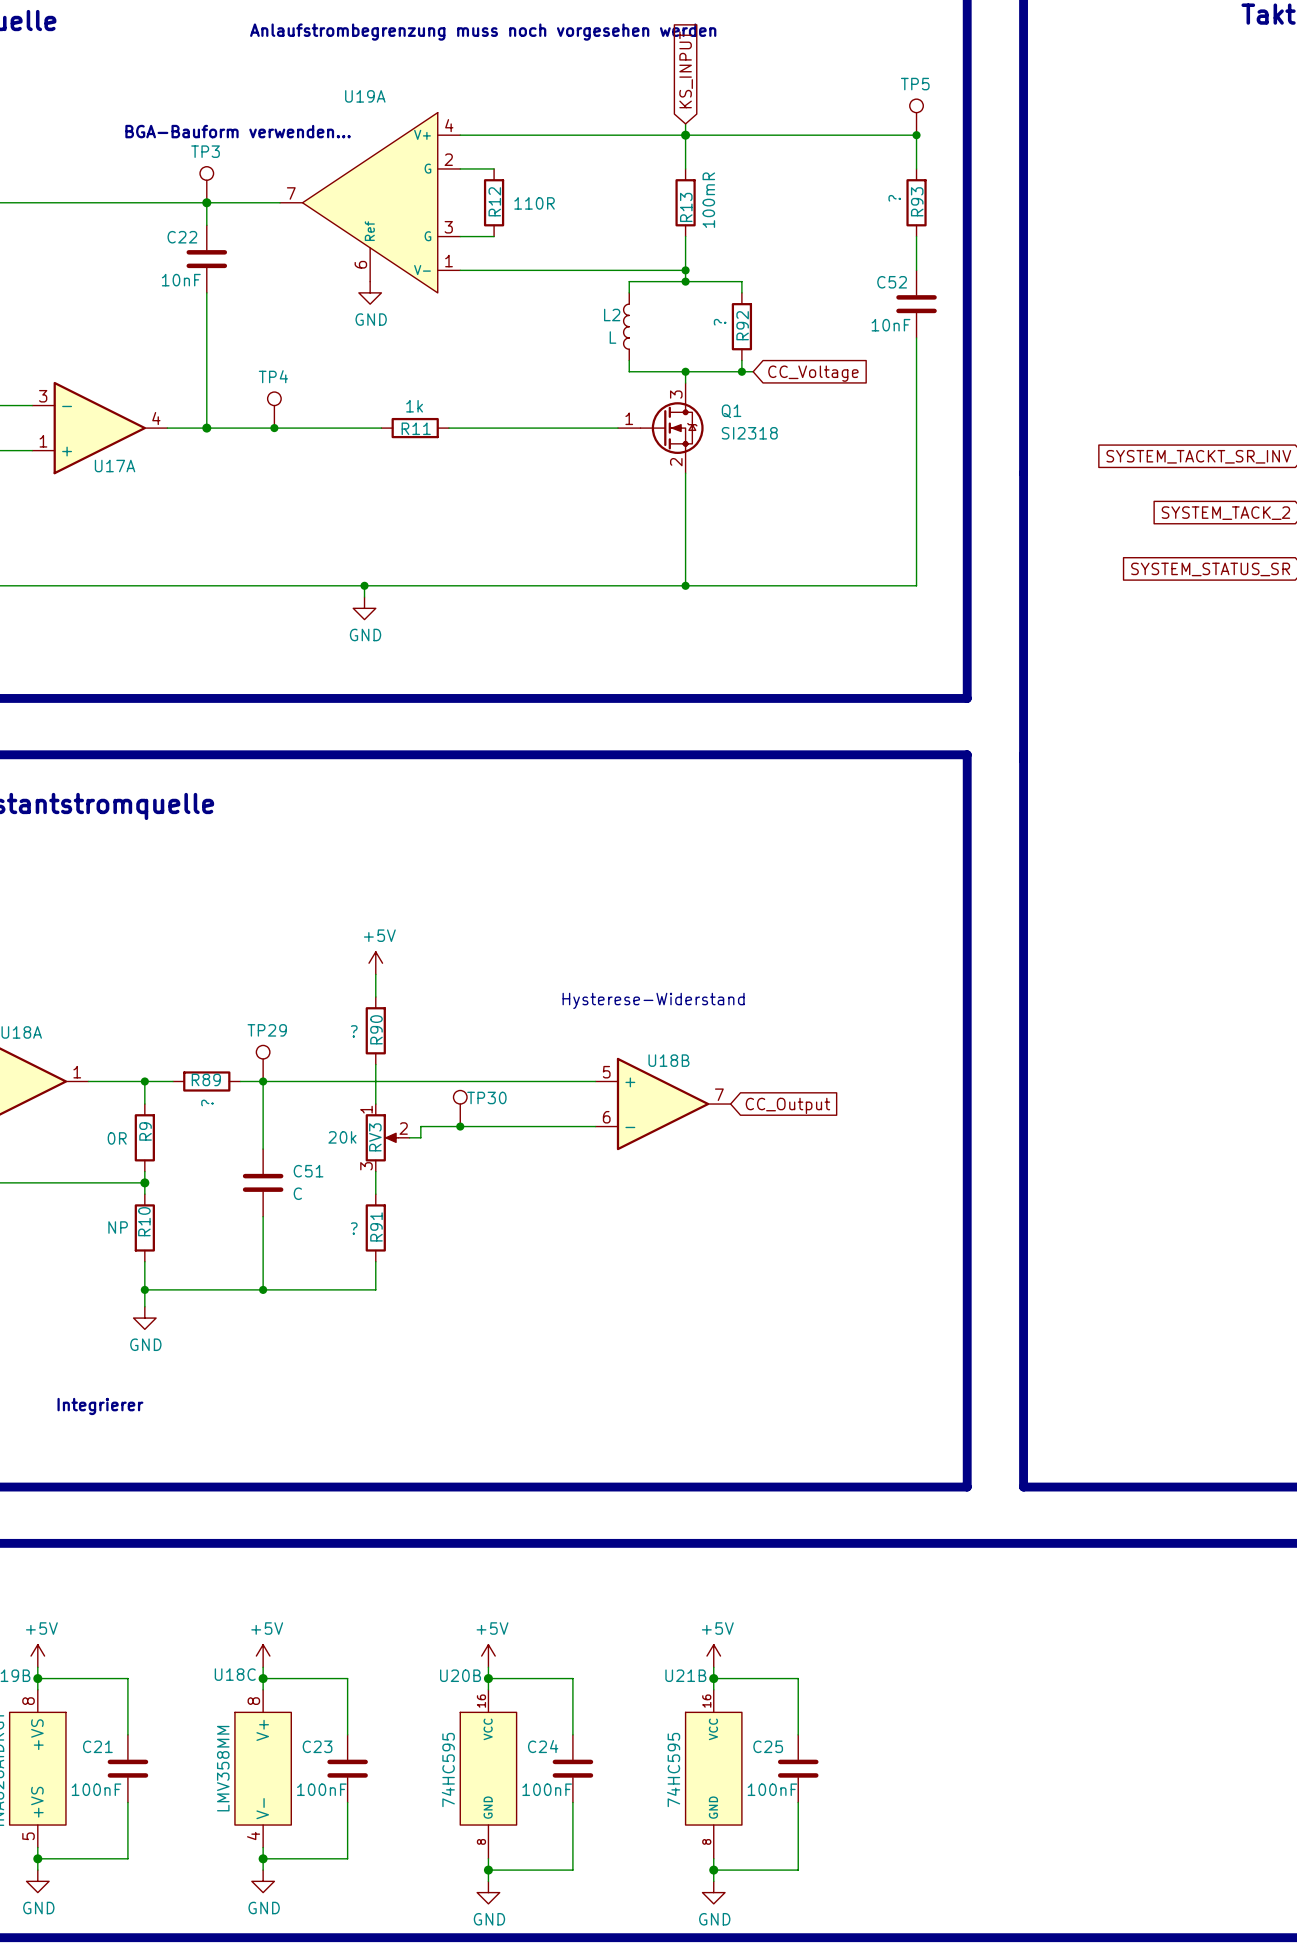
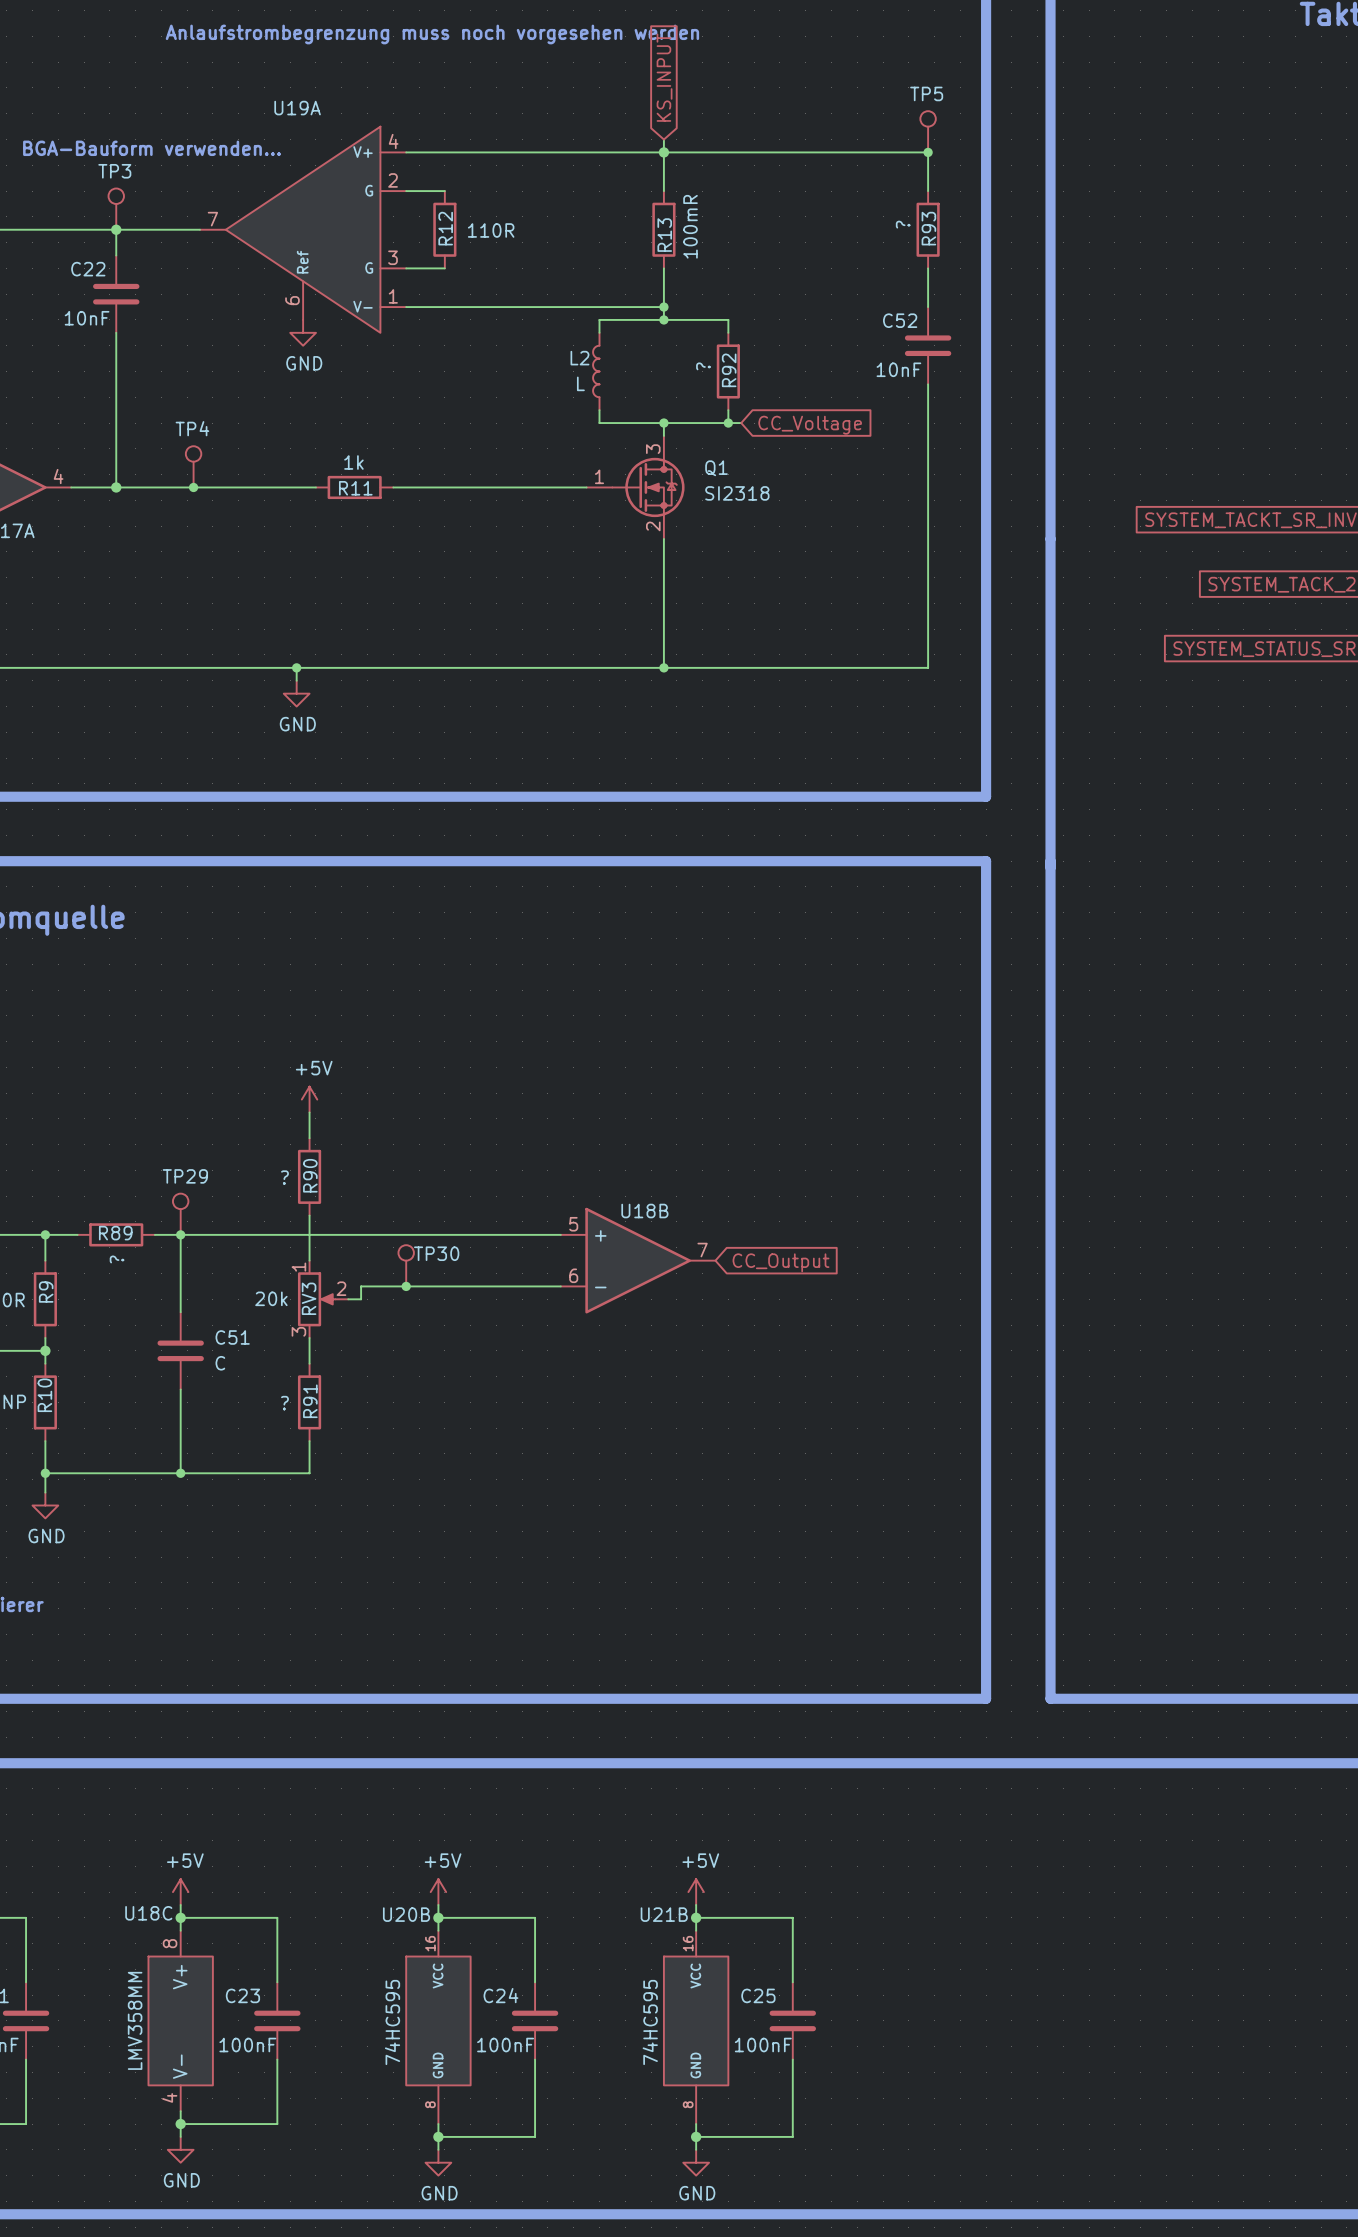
text: Hysterese-Widerstand (653, 1000) -> none

